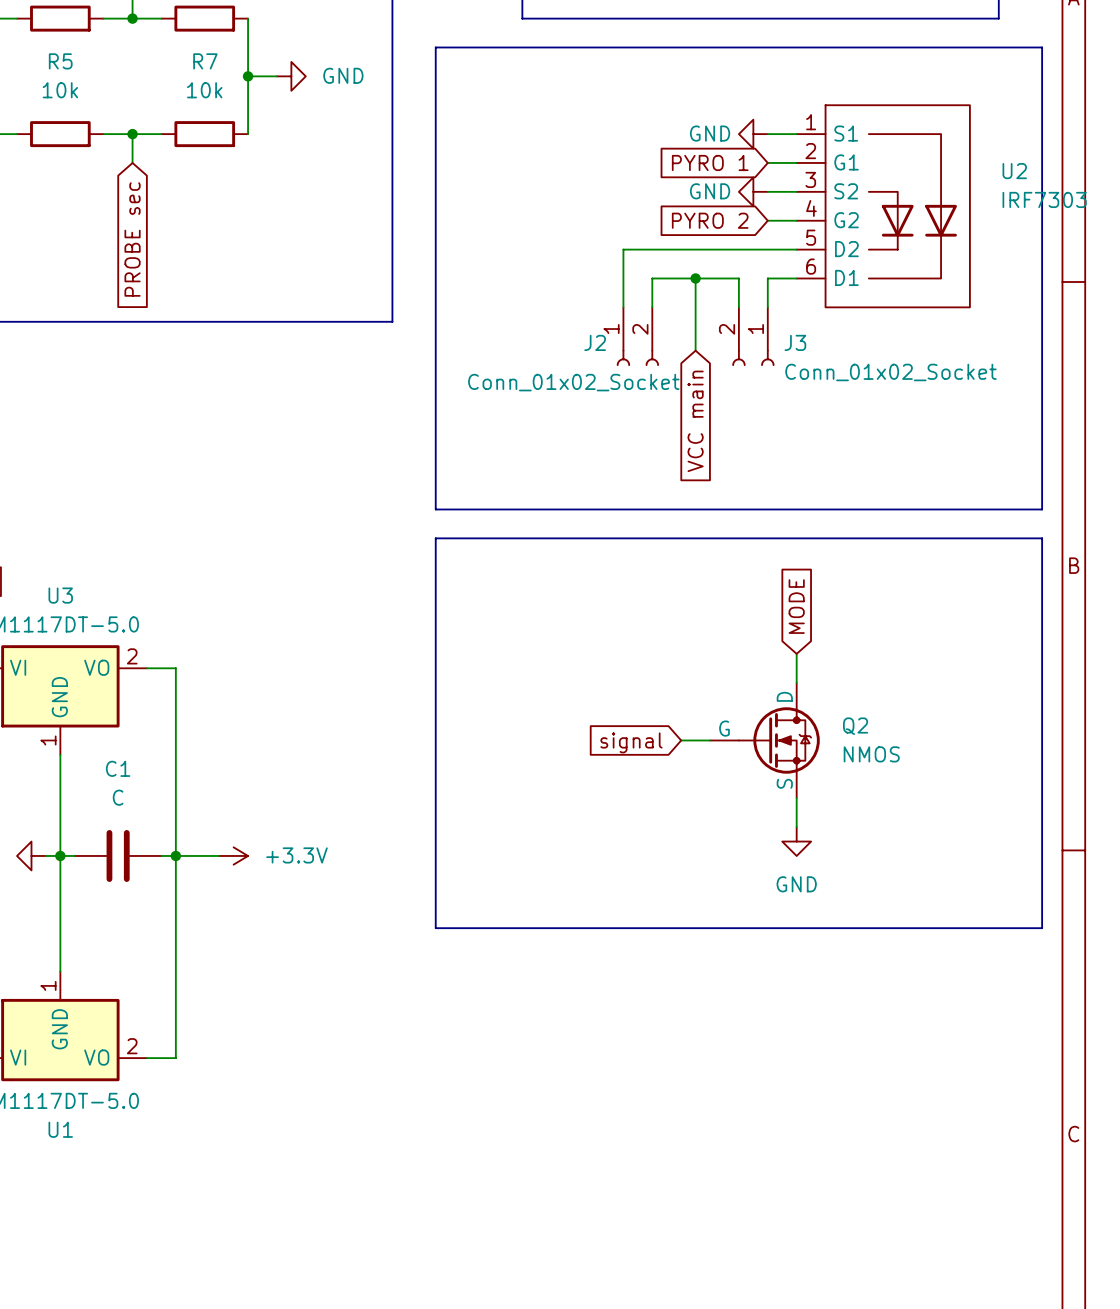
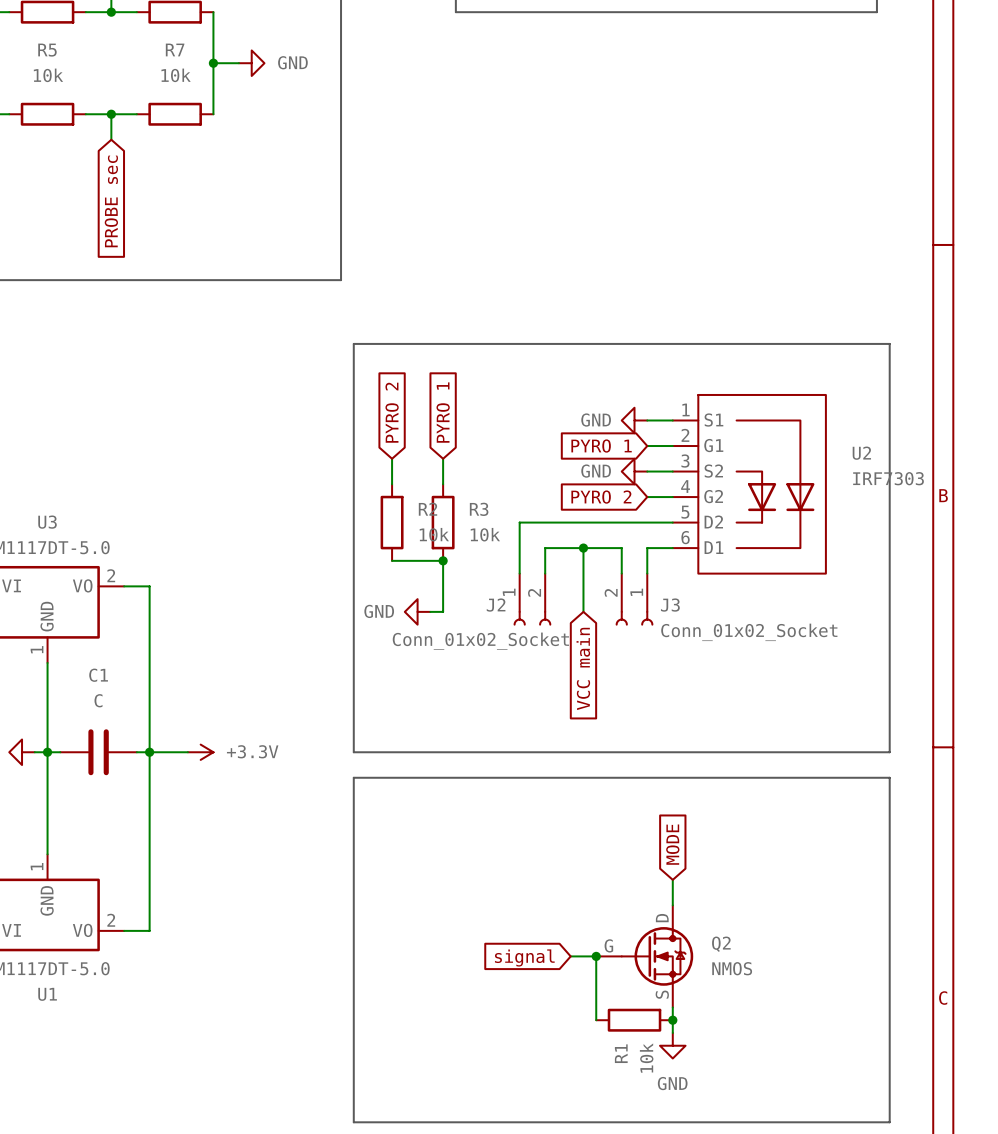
line: (435, 47) (435, 509) (1042, 509) (1042, 47) (435, 47) -> none
power symbol: GND (753, 134) -> none
wire: (767, 134) (796, 134) -> none
global label: PYRO 1 (710, 162) -> none
wire: (767, 162) (796, 162) -> none
power symbol: GND (753, 191) -> none
wire: (767, 191) (796, 191) -> none
U2 position: (883, 206) -> (749, 484)
global label: PYRO 2 (710, 220) -> none
wire: (767, 220) (796, 220) -> (647, 420) (672, 420)
wire: (796, 249) (623, 249) (623, 307) -> none
wire: (695, 278) (695, 350) -> none
junction: (695, 278) -> none
wire: (796, 278) (767, 278) (767, 307) -> none
wire: (652, 307) (652, 278) (738, 278) (738, 307) -> none
J2 position: (637, 336) -> (532, 599)
J3 position: (753, 336) -> (634, 599)
global label: VCC main (695, 421) -> none
global label: none -> PYRO 2 (392, 412)
global label: none -> PYRO 1 (443, 412)
power symbol: none -> GND (634, 420)
global label: none -> PYRO 1 (601, 446)
wire: none -> (392, 458) (392, 484)
wire: none -> (443, 458) (443, 484)
line: (435, 538) (1042, 538) (1042, 928) (435, 928) (435, 538) -> (353, 343) (353, 752) (889, 752) (889, 343) (353, 343)
power symbol: none -> GND (634, 471)
global label: none -> PYRO 2 (601, 497)
R2: none -> 10k (392, 522)
R3: none -> 10k (443, 522)
wire: none -> (672, 522) (519, 522) (519, 573)
global label: MODE (796, 606) -> none
wire: none -> (583, 548) (583, 611)
junction: none -> (583, 548)
wire: none -> (672, 548) (647, 548) (647, 573)
wire: none -> (392, 560) (443, 560) (443, 611) (430, 611)
junction: none -> (443, 560)
wire: none -> (545, 573) (545, 548) (621, 548) (621, 573)
wire: (796, 653) (796, 682) -> none
power symbol: none -> GND (417, 611)
wire: (681, 740) (710, 740) -> (647, 497) (672, 497)
Q2 position: (764, 740) -> (644, 956)
global label: signal (631, 742) -> none
global label: none -> VCC main (583, 668)
wire: (796, 798) (796, 827) -> (672, 879) (672, 905)
power symbol: GND (796, 841) -> none
line: none -> (353, 777) (889, 777) (889, 1122) (353, 1122) (353, 777)
global label: none -> MODE (672, 844)
wire: none -> (570, 956) (596, 956) (596, 1020)
junction: none -> (596, 956)
global label: none -> signal (524, 957)
wire: none -> (672, 1007) (672, 1032)
R1: none -> 10k (634, 1020)
junction: none -> (672, 1020)
power symbol: none -> GND (672, 1045)

